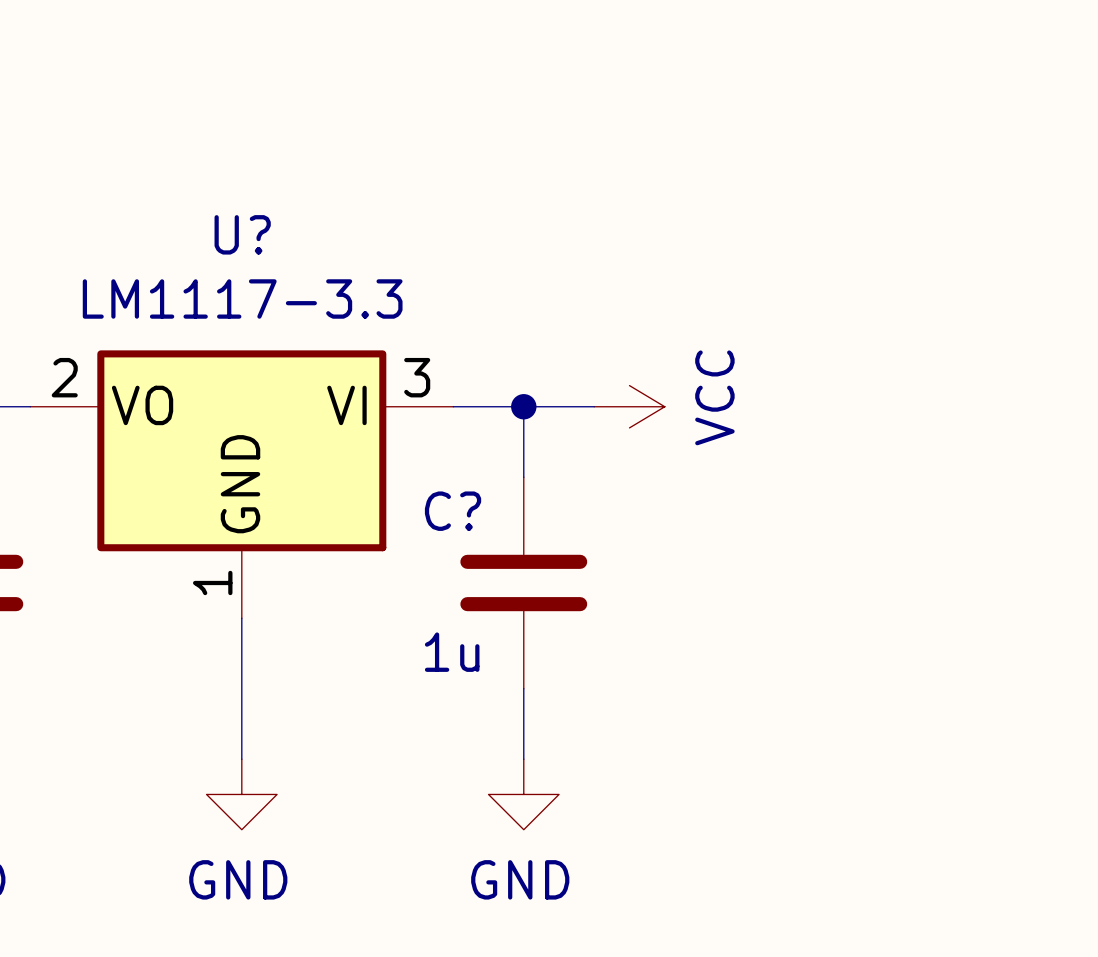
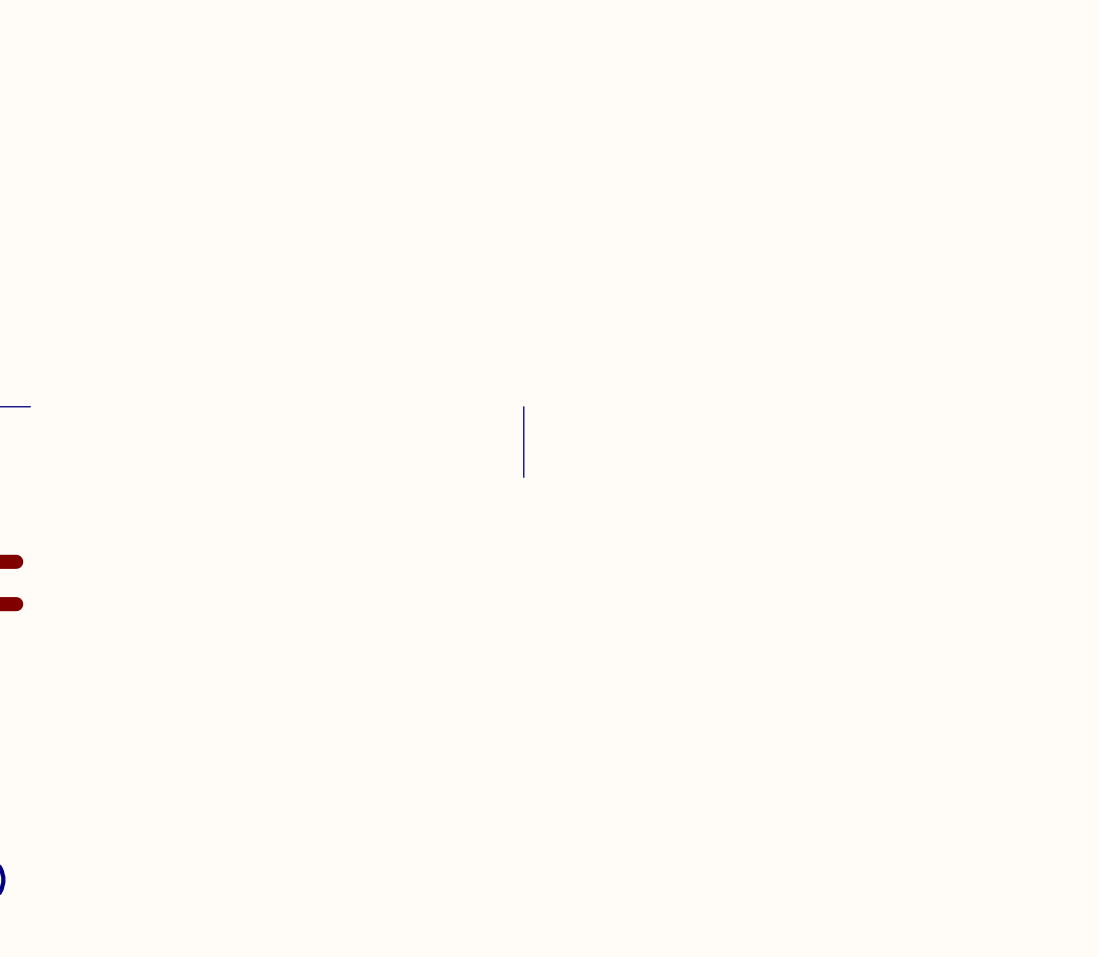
wire: (453, 406) (594, 406) -> none
junction: (523, 406) -> none
power symbol: VCC (629, 406) -> none
U?: LM1117-3.3 (241, 484) -> none
C?: 1u (523, 582) -> none
wire: (241, 618) (241, 759) -> none
wire: (523, 688) (523, 759) -> none
power symbol: GND (241, 794) -> none
power symbol: GND (523, 794) -> none

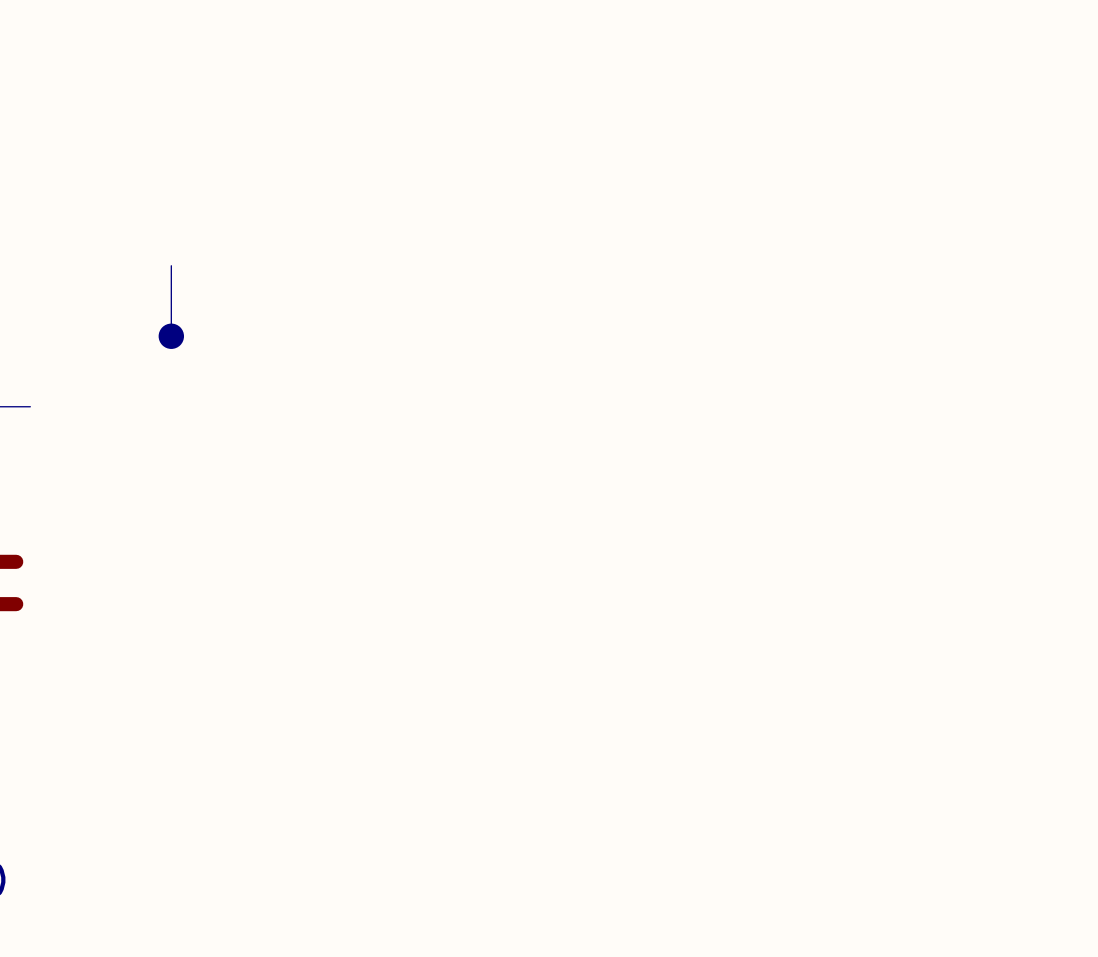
junction: none -> (171, 336)
wire: (523, 406) (523, 477) -> (171, 265) (171, 336)

